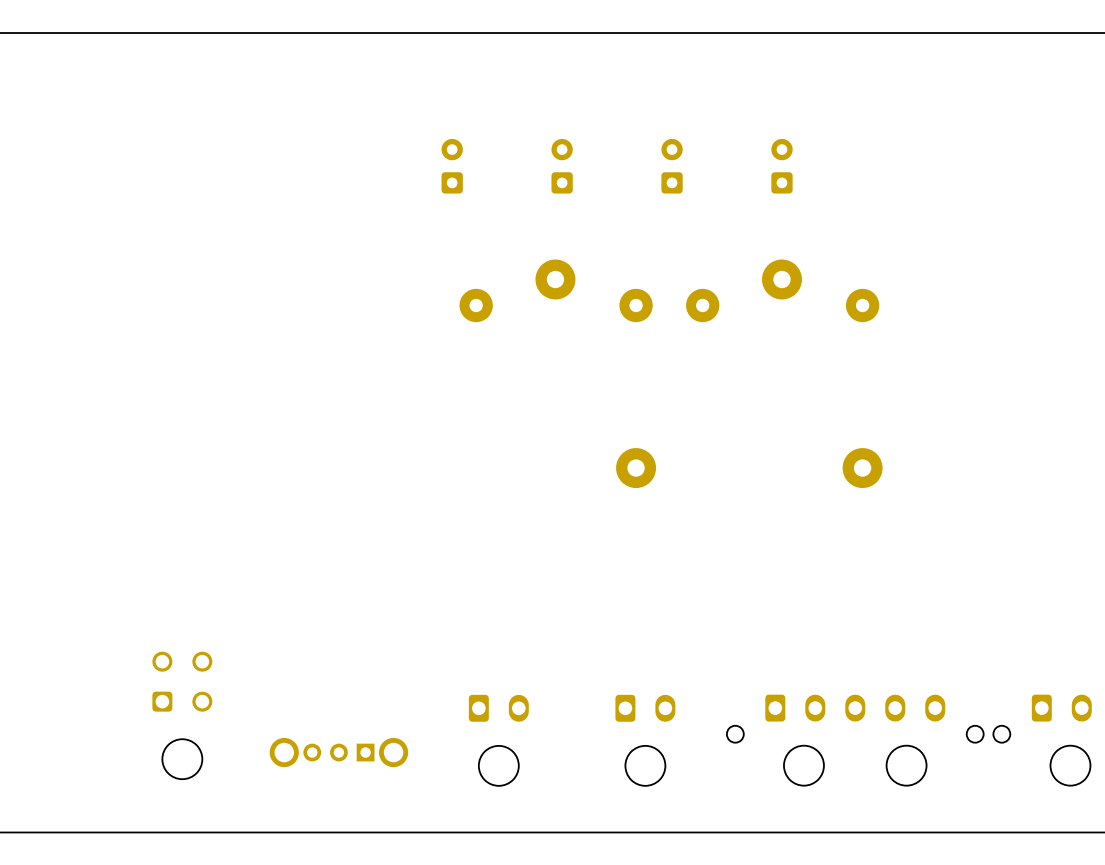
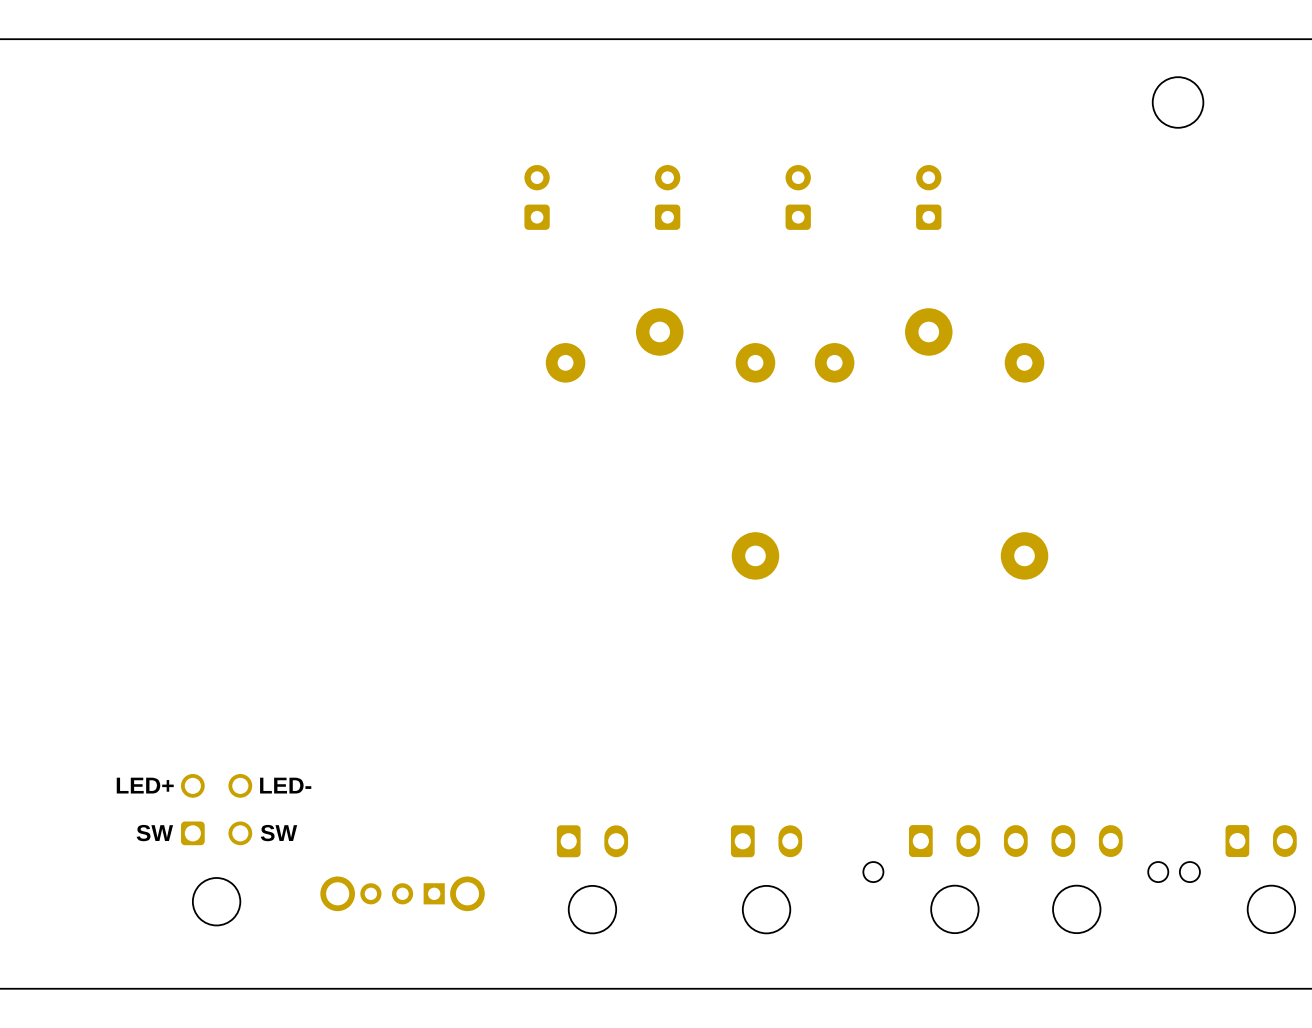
round board edge: none -> [1152, 76, 1204, 129]
text: none -> LED+ (145, 785)
text: none -> LED- (285, 785)
text: none -> SW (154, 833)
text: none -> SW (278, 833)

